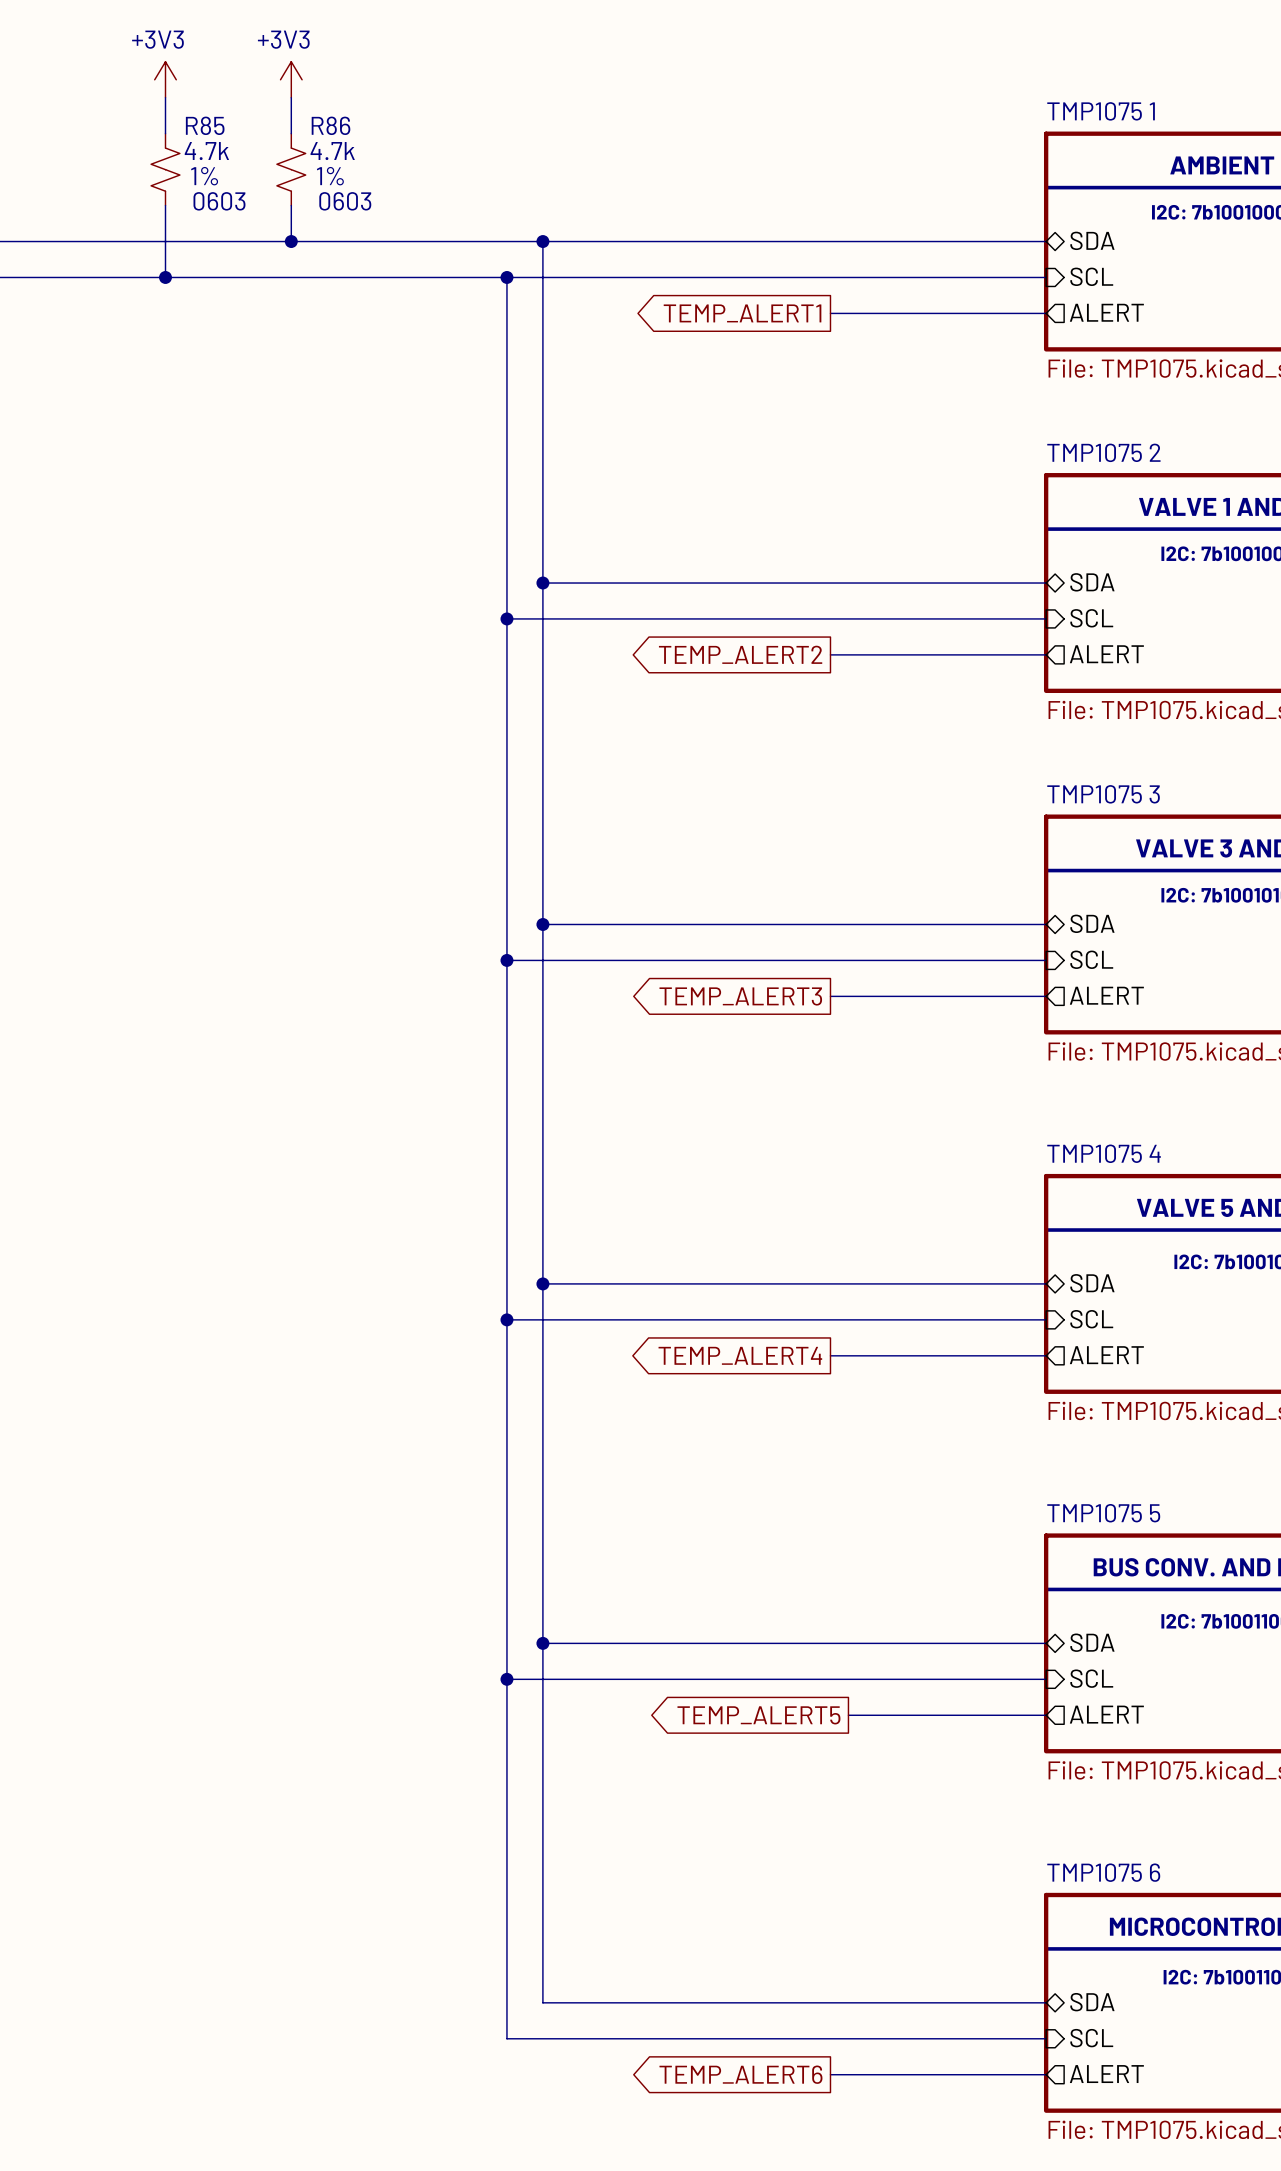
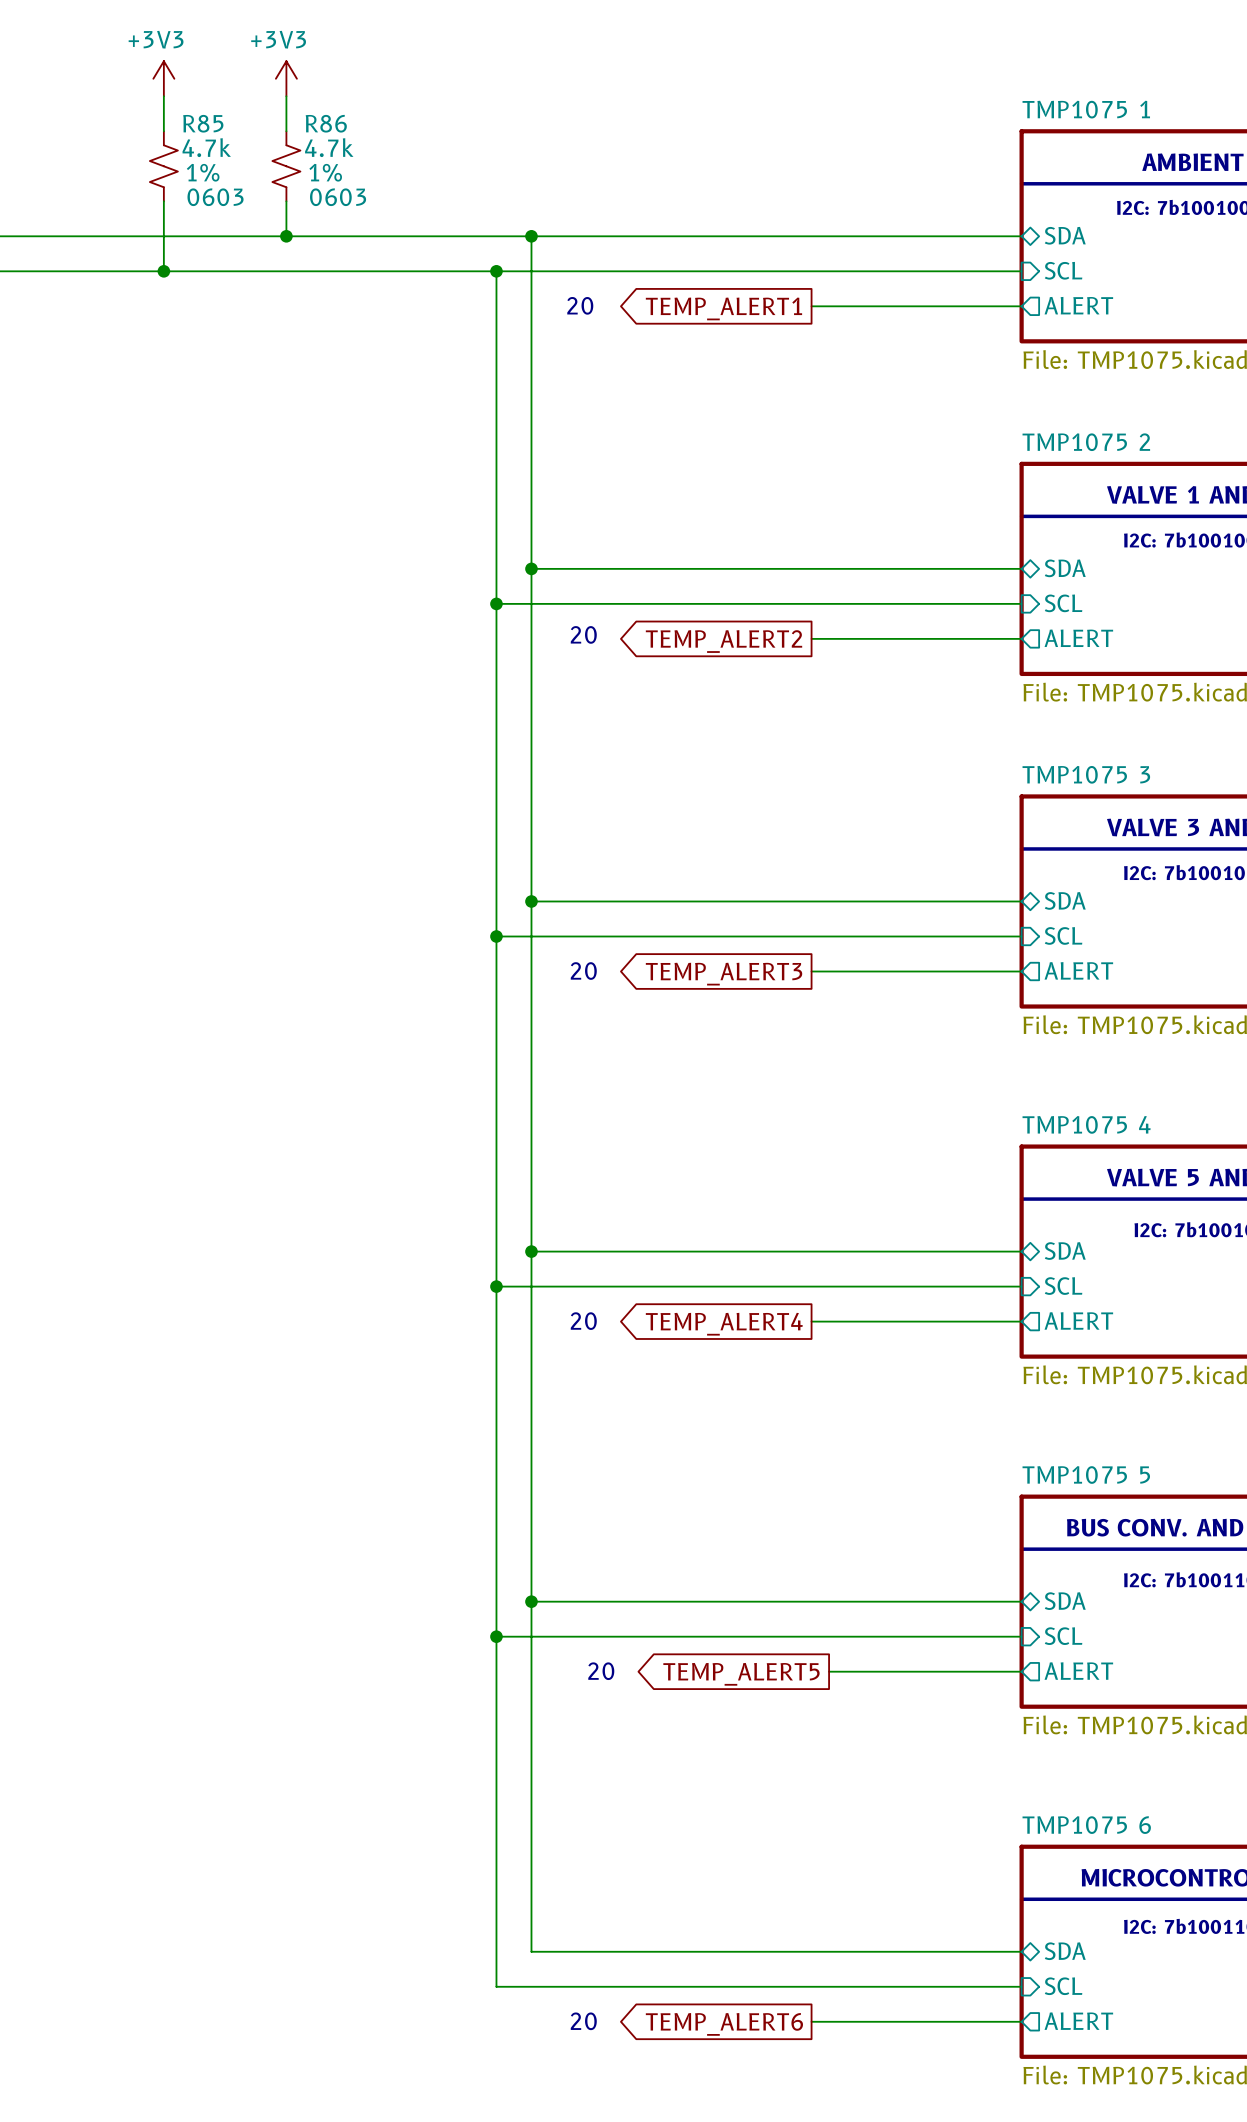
text: none -> 20 (580, 305)
text: none -> 20 (583, 634)
text: none -> 20 (583, 971)
text: none -> 20 (583, 1321)
text: none -> 20 (601, 1671)
text: none -> 20 (583, 2021)

